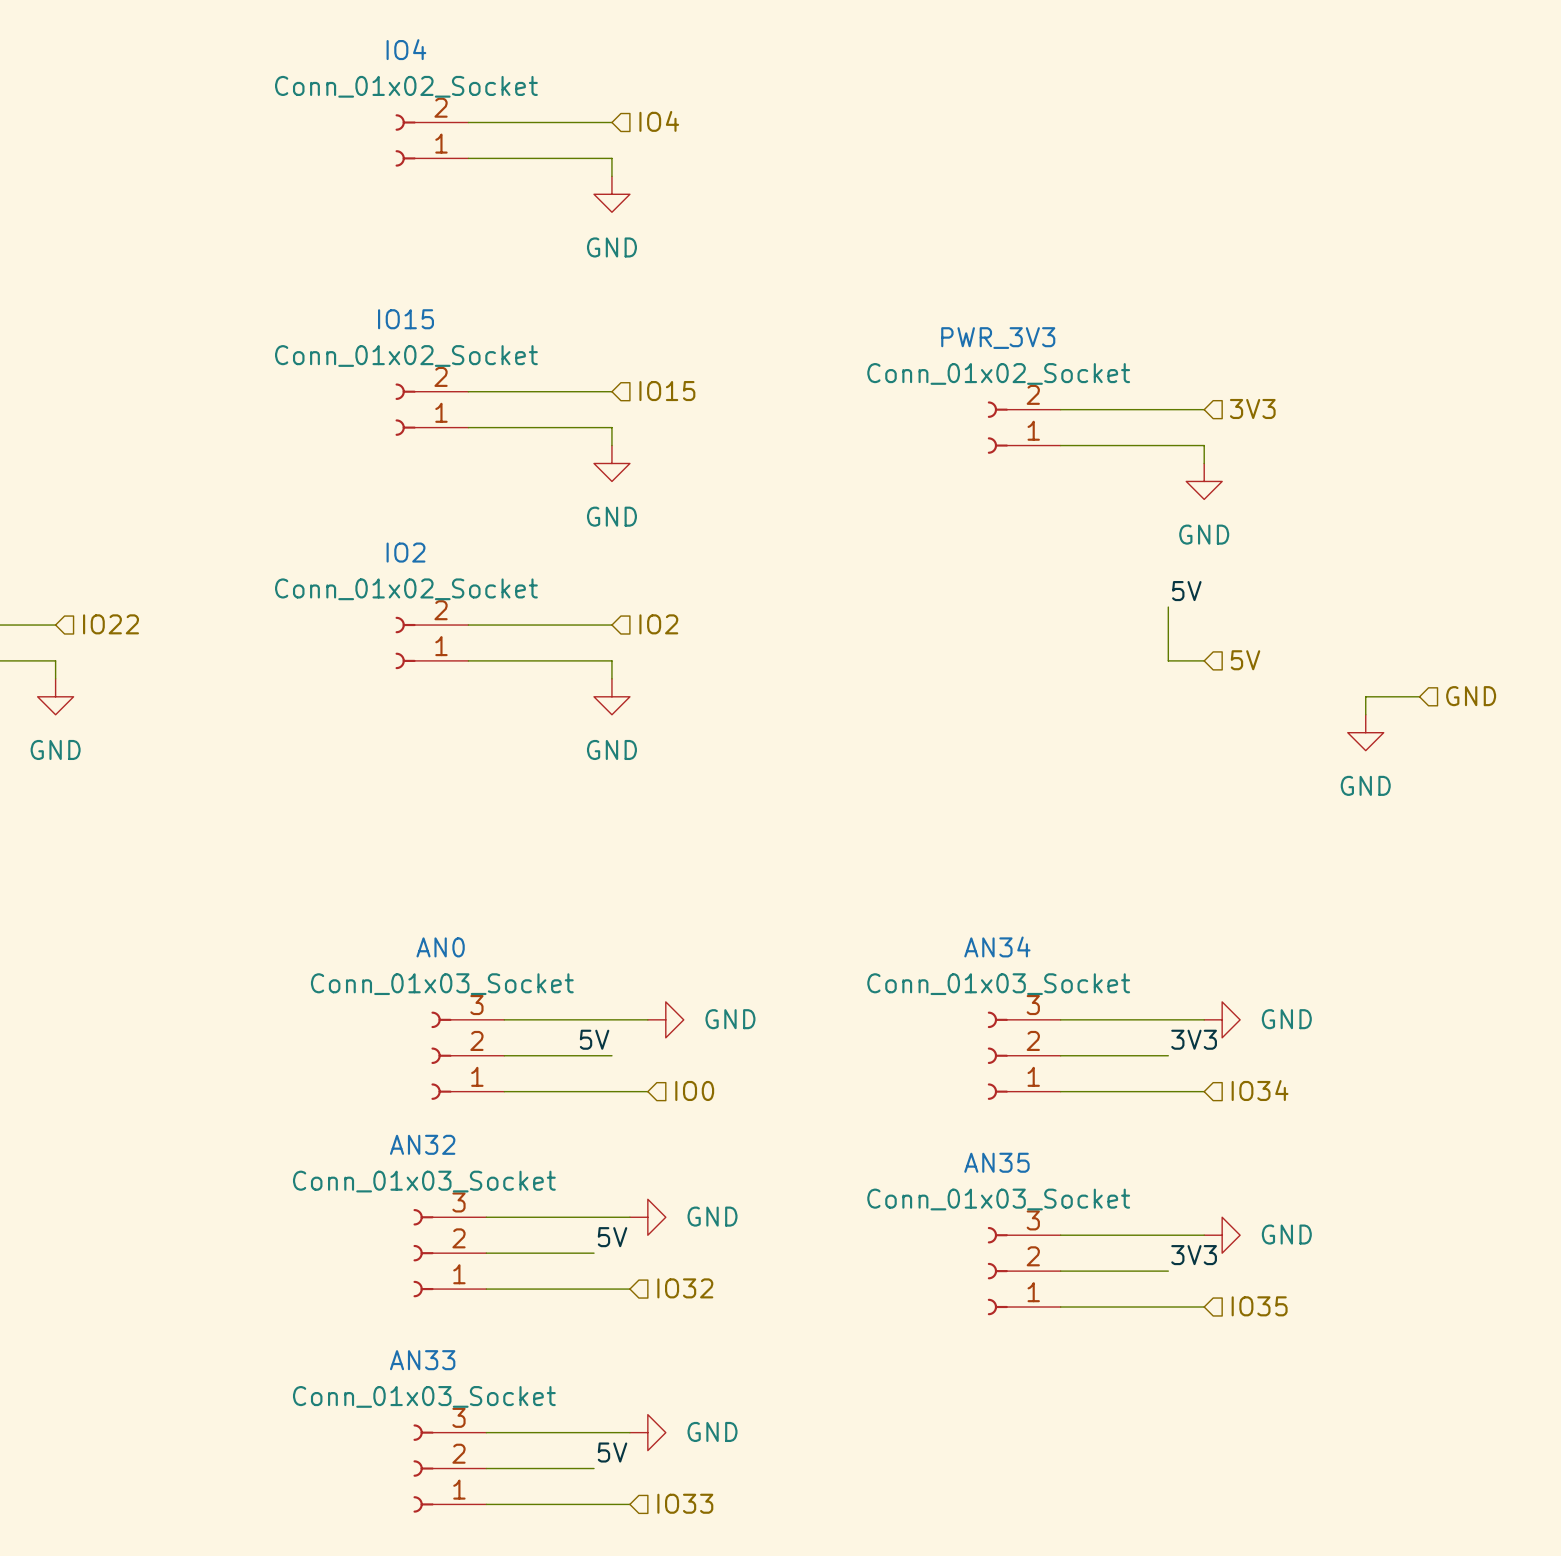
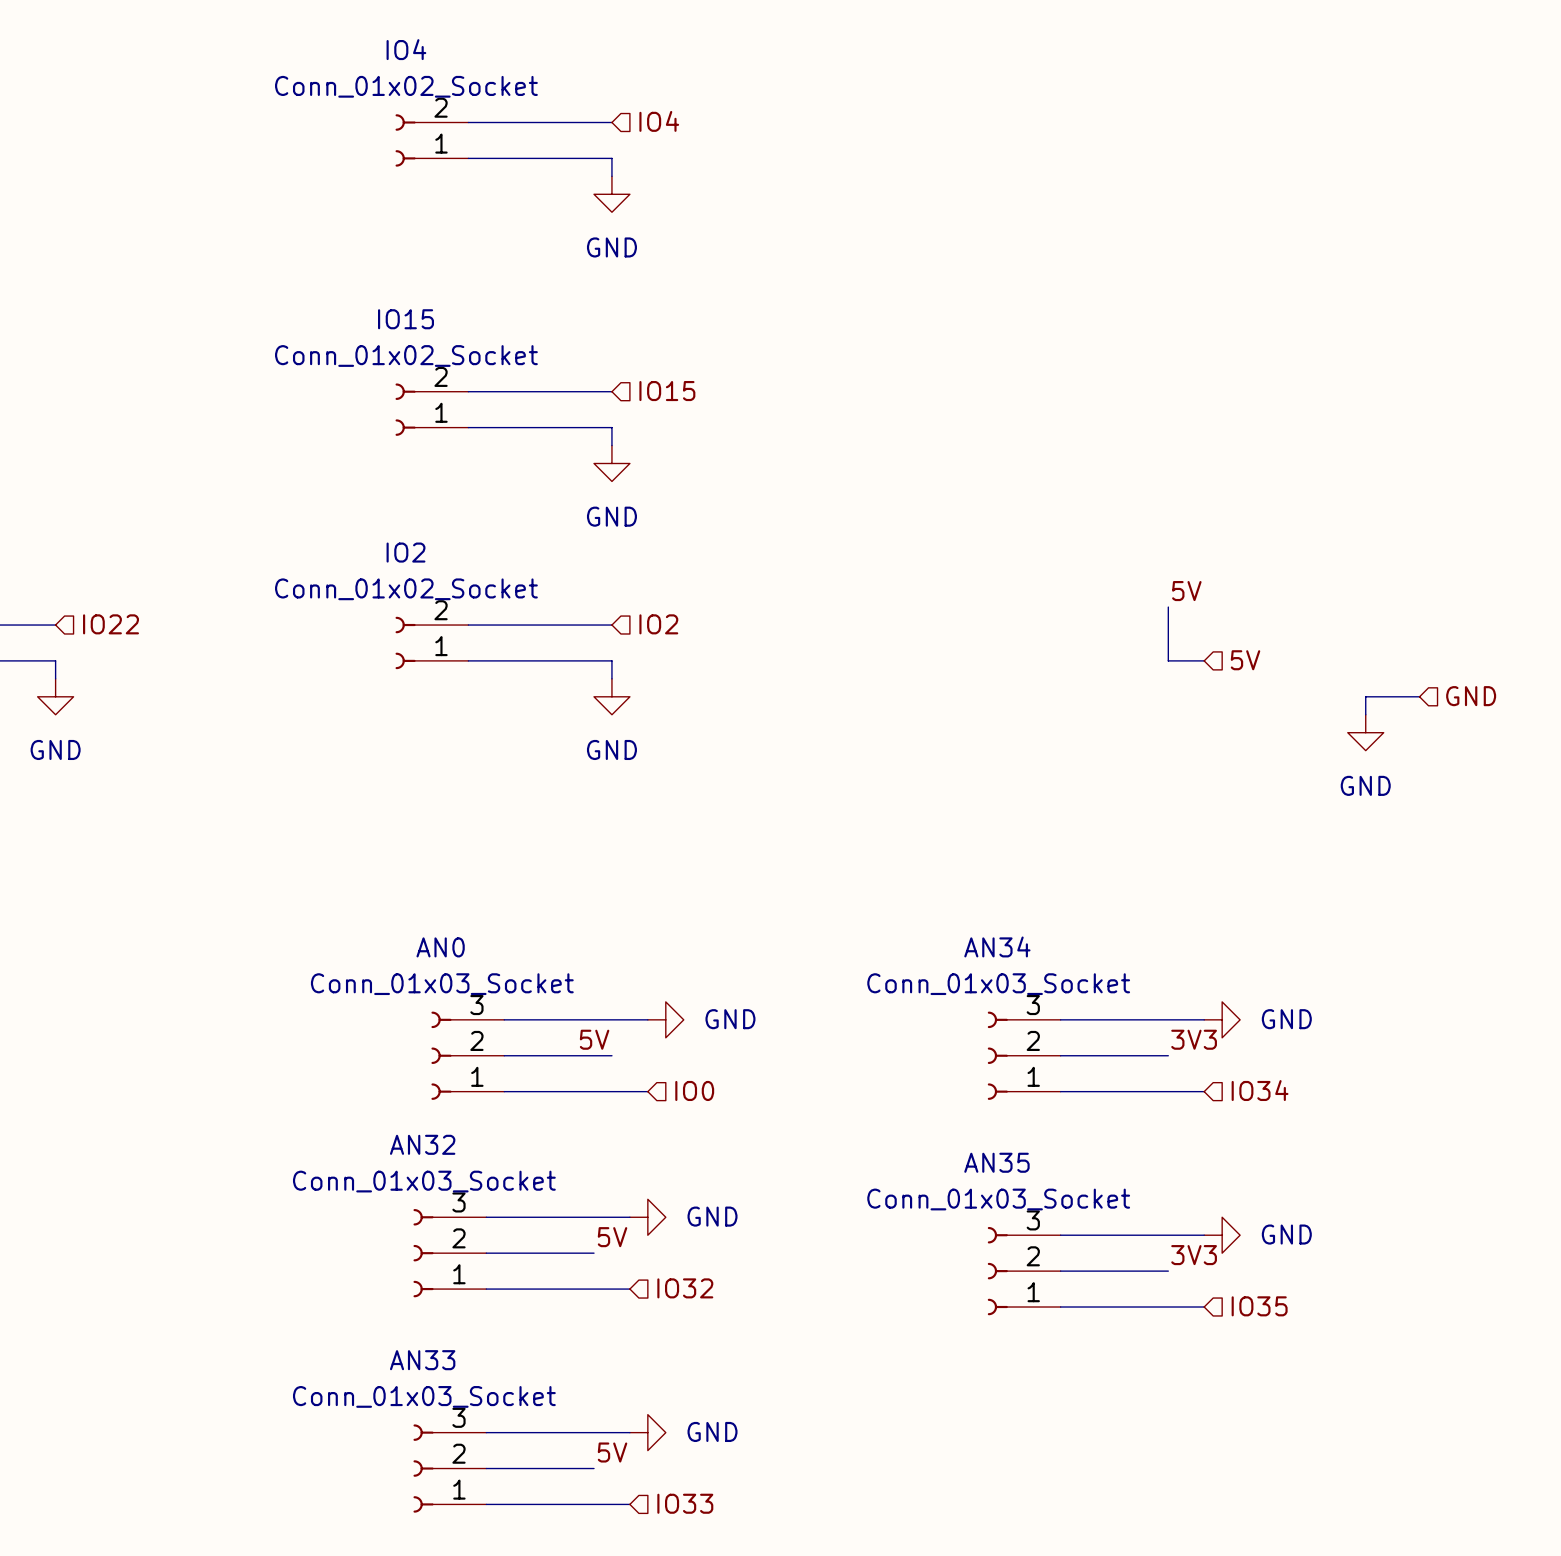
hierarchical label: 3V3 (1252, 408) -> none
wire: (1060, 409) (1204, 409) -> none
PWR_3V3: Conn_01x02_Socket (1024, 427) -> none
wire: (1060, 445) (1204, 445) (1204, 463) -> none
power symbol: GND (1204, 481) -> none

